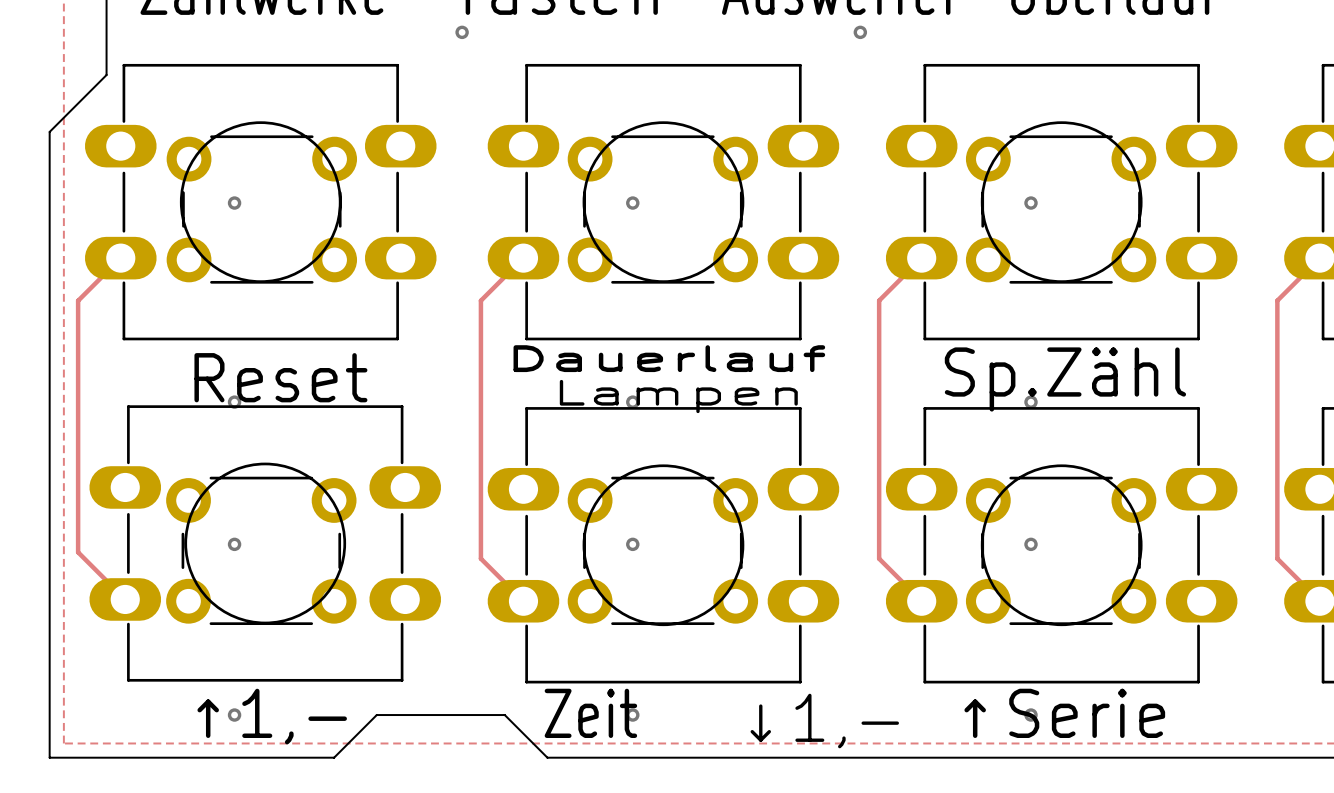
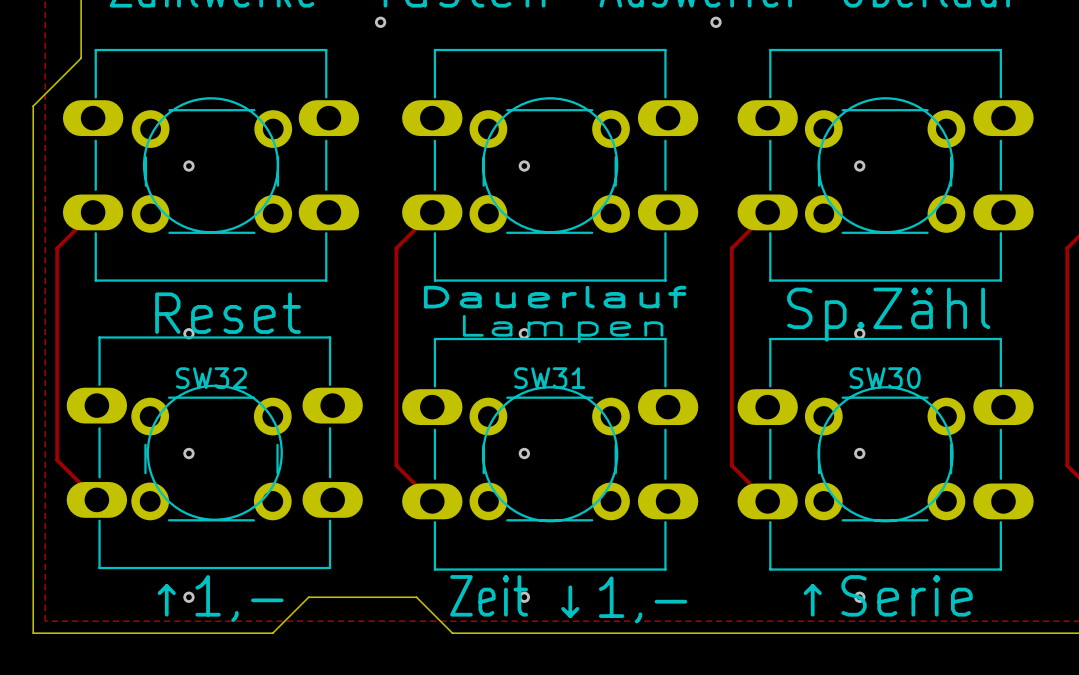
SW32 name: none -> SW32 (211, 378)
SW31 name: none -> SW31 (549, 378)
SW30 name: none -> SW30 (885, 378)
SW31 value position: ↓1,- (824, 721) -> ↓1,- (624, 599)

